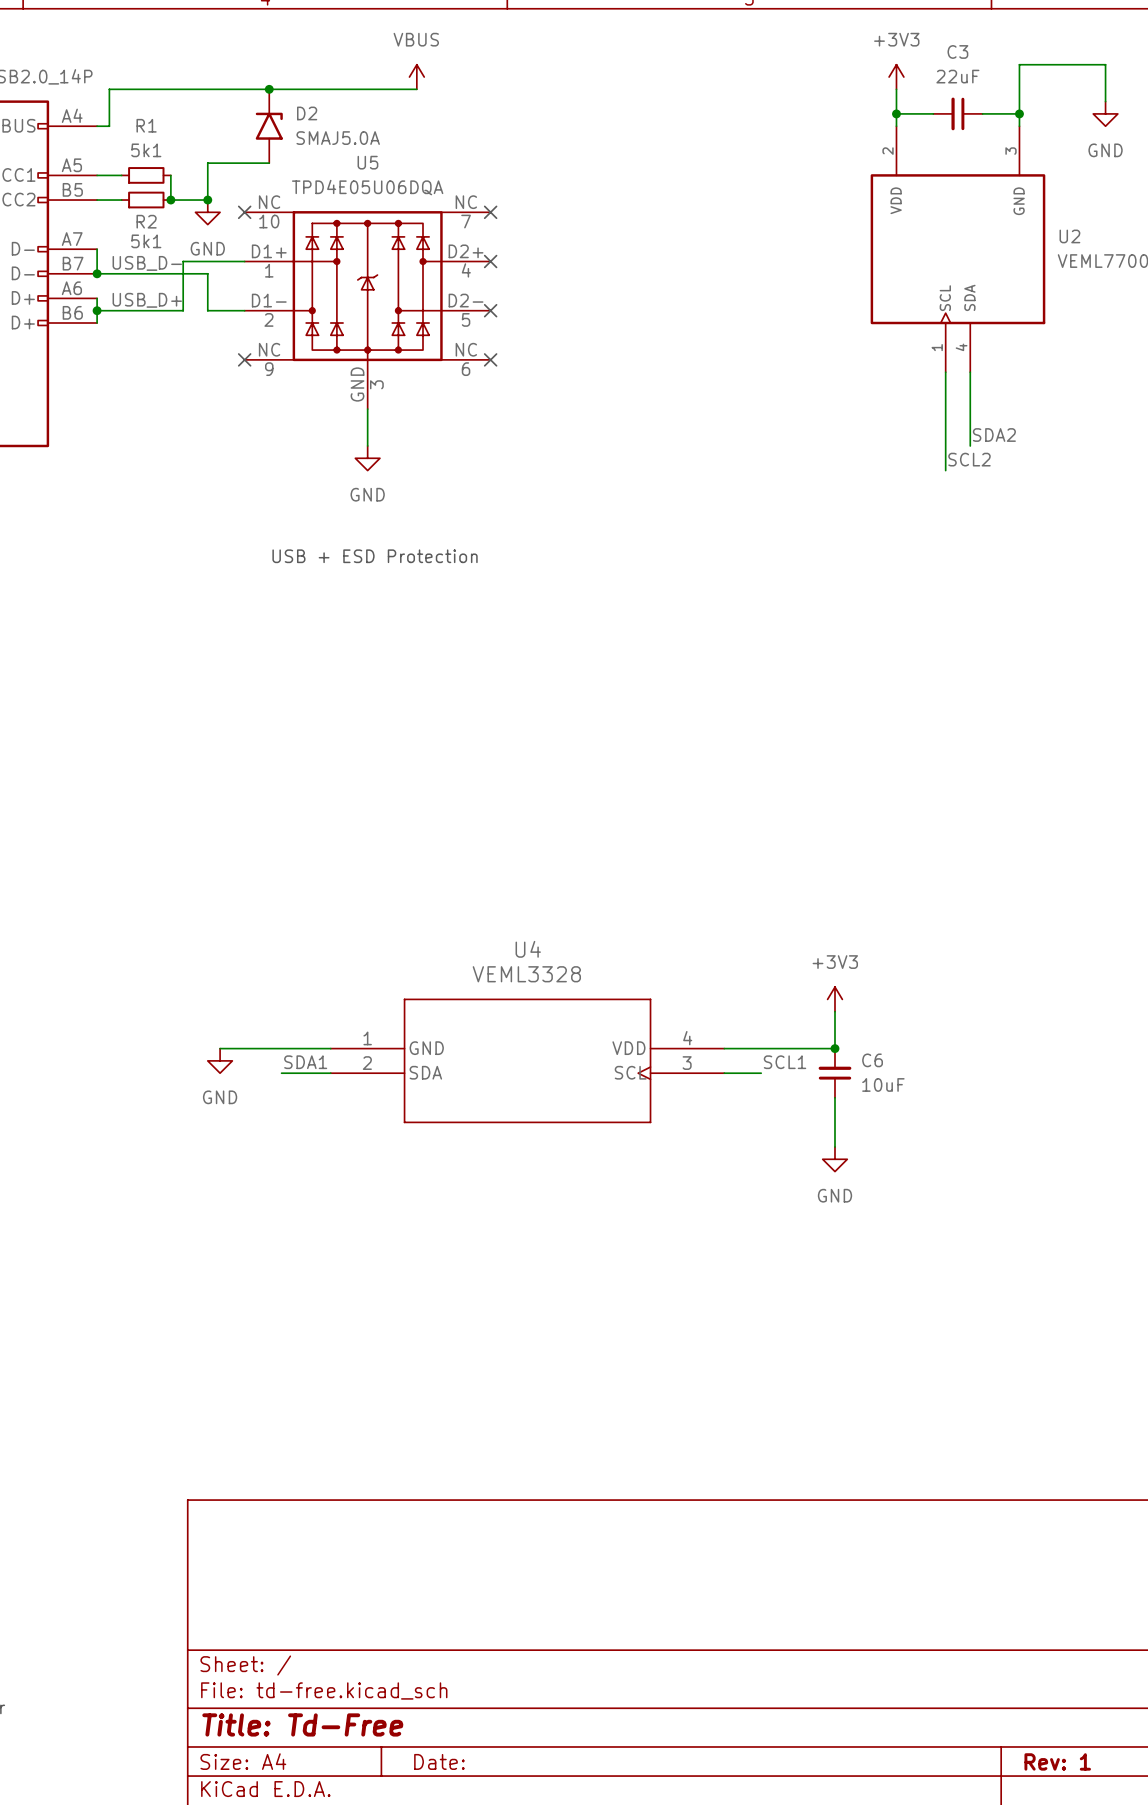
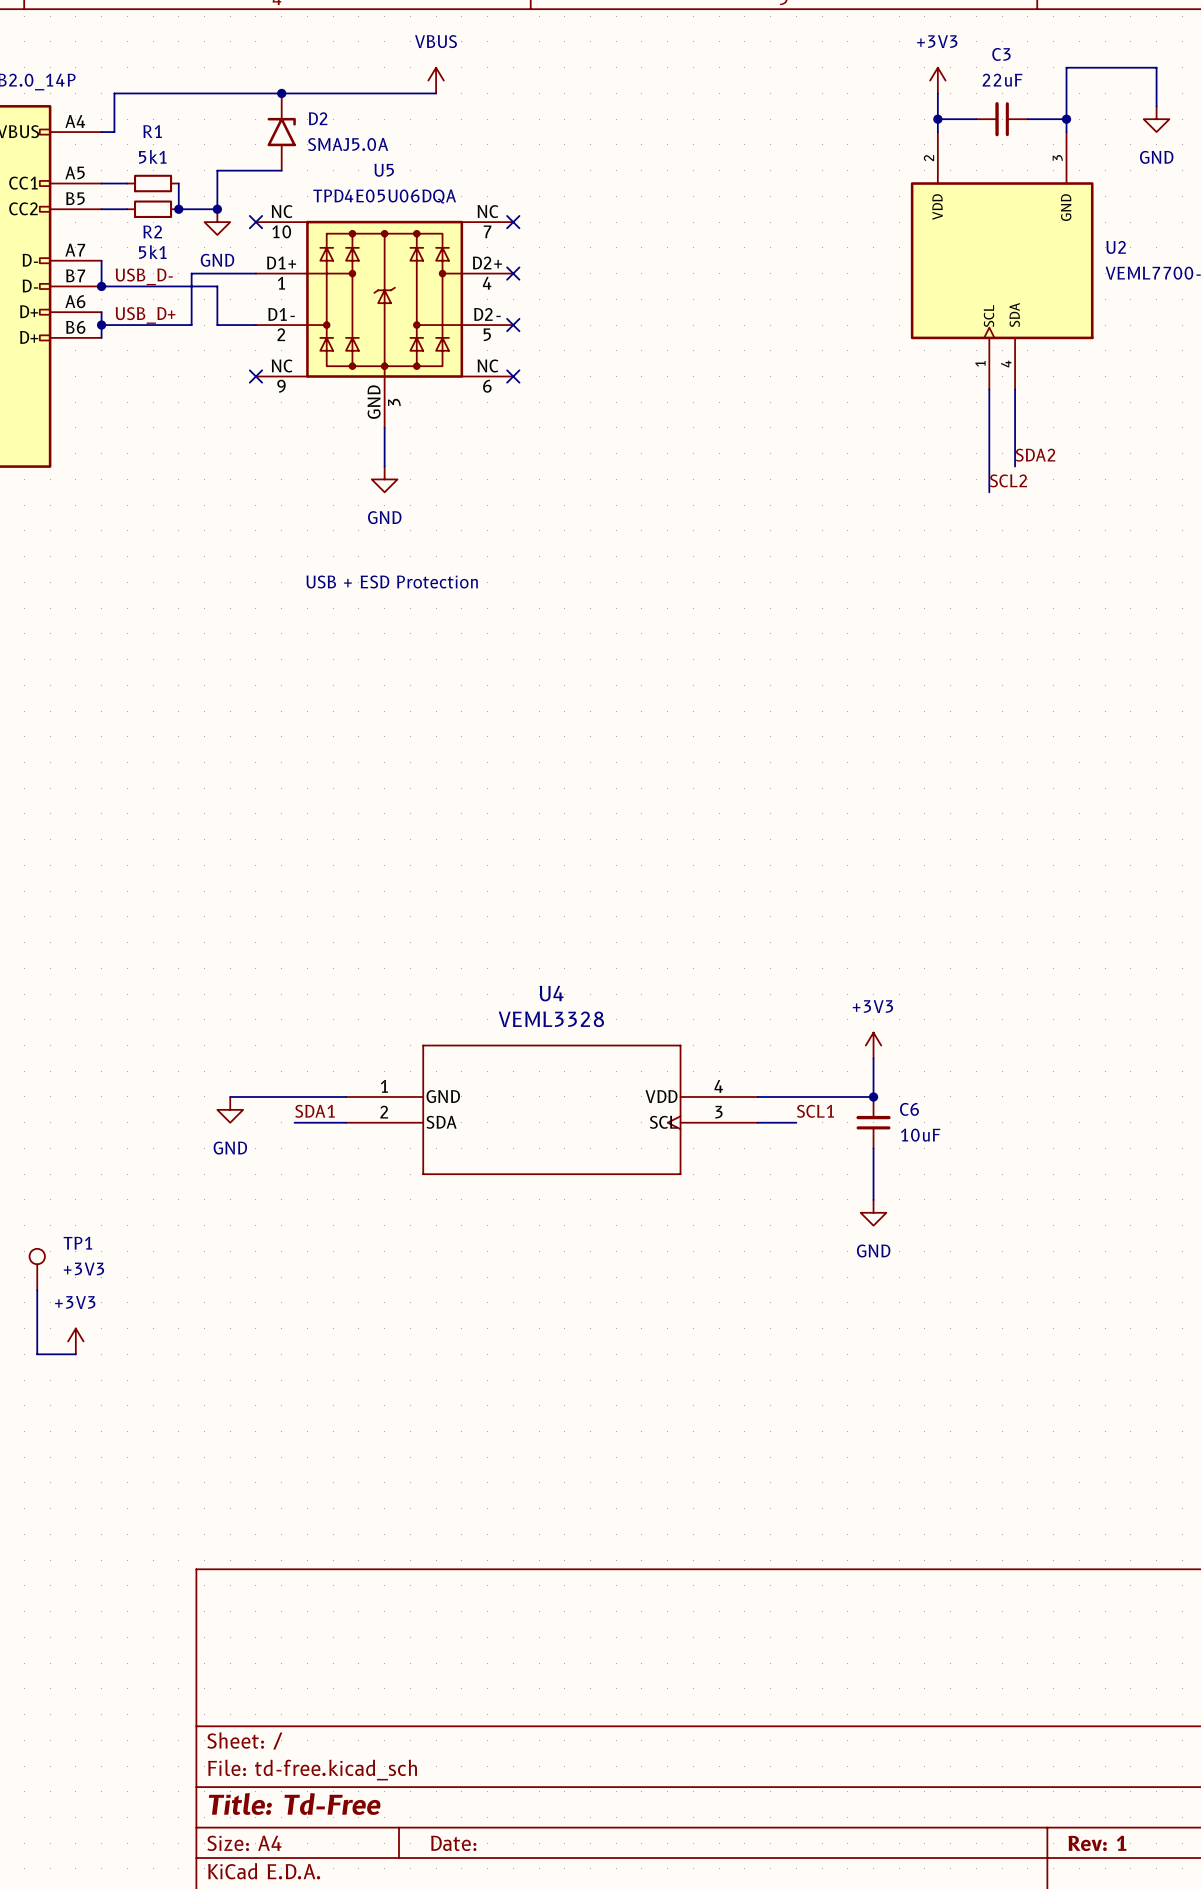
TP1: none -> +3V3 (37, 1269)
wire: none -> (37, 1289) (37, 1354) (75, 1354)
power symbol: none -> +3V3 (75, 1341)

